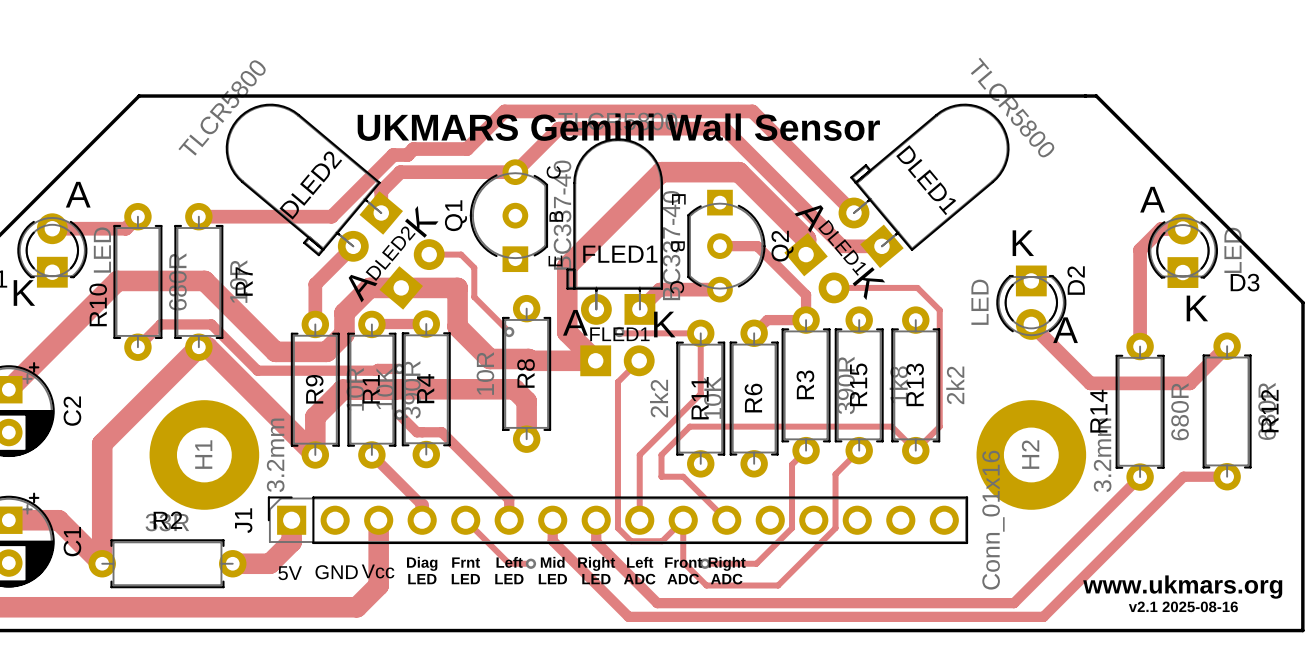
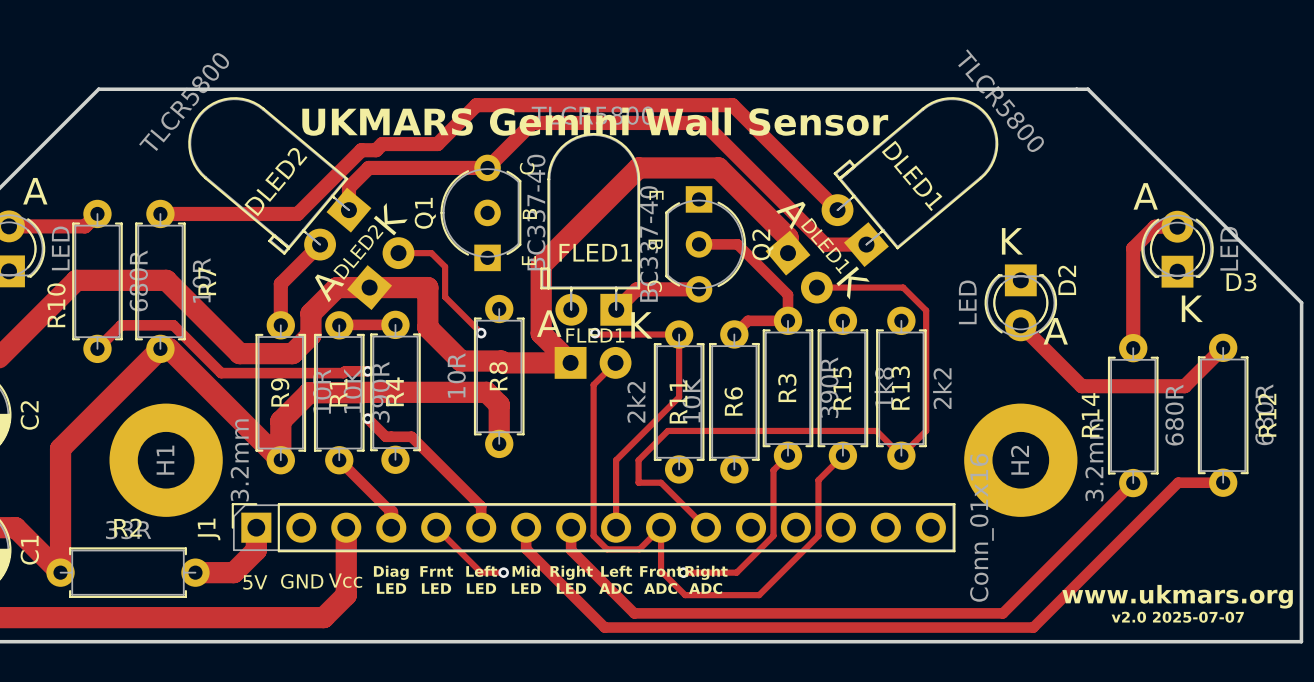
text: v2.1 2025-08-16 (1183, 606) -> v2.0 2025-07-07 (1177, 617)

